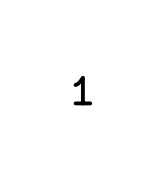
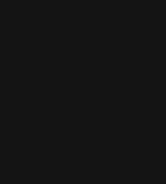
text: 1 (82, 90) -> none

